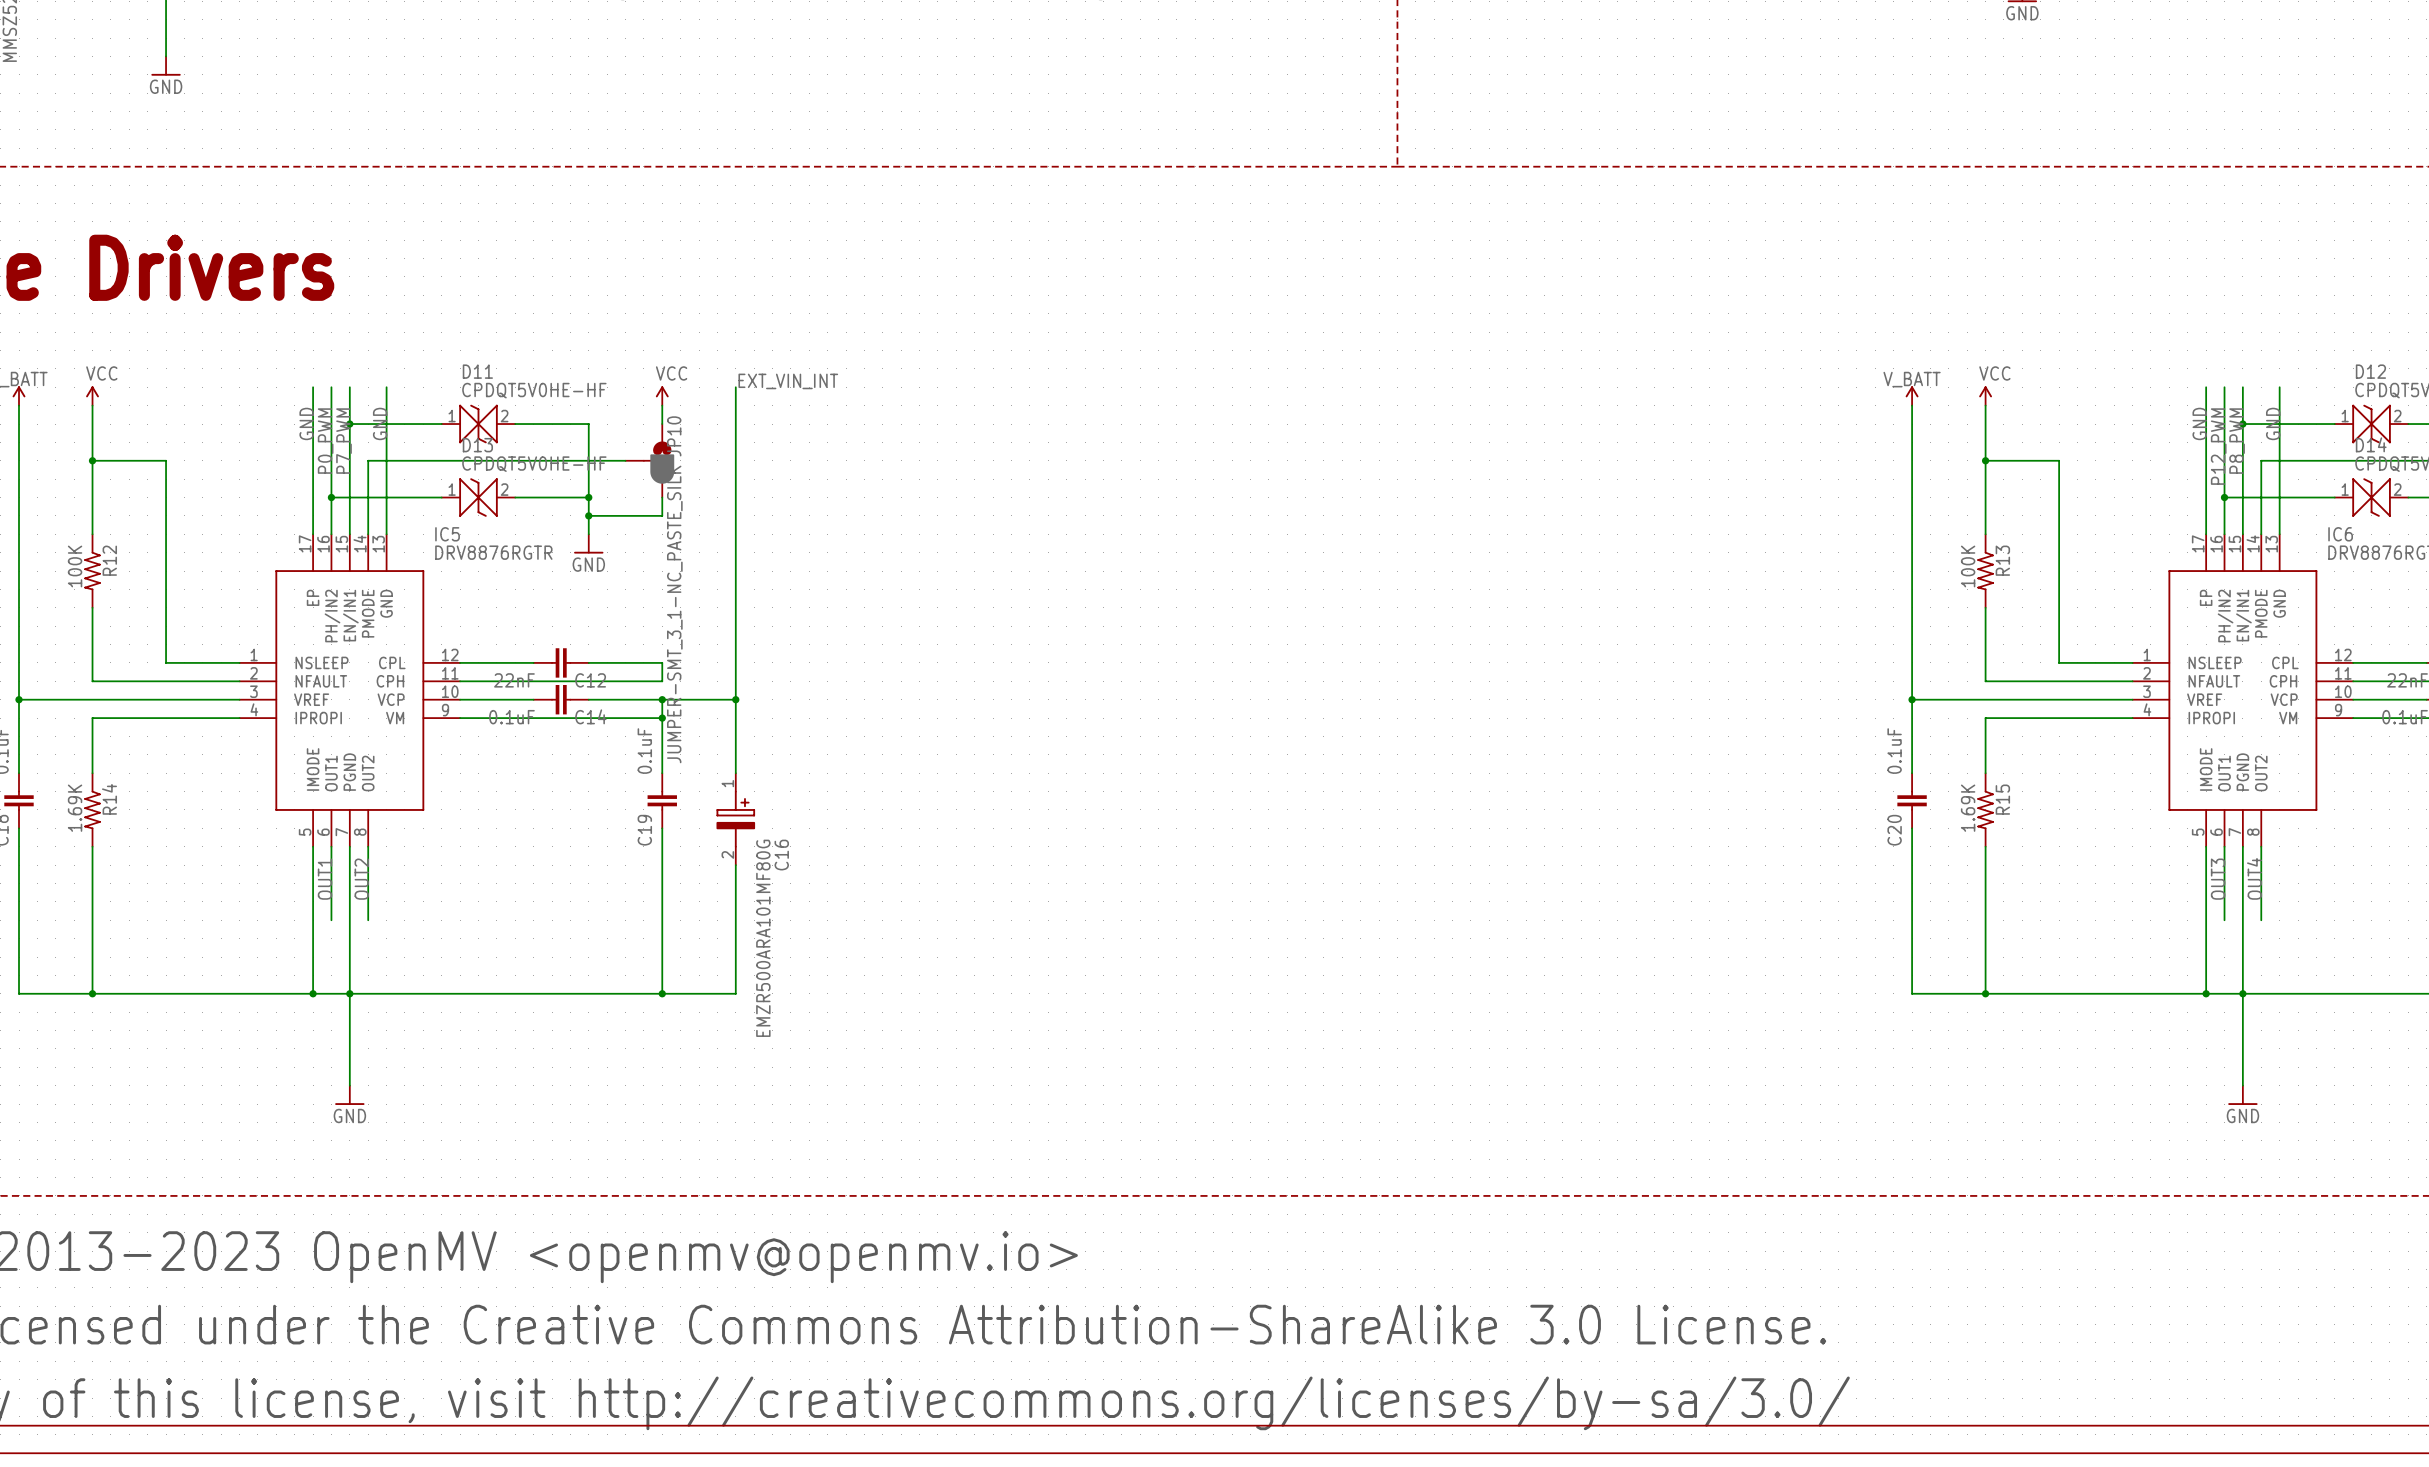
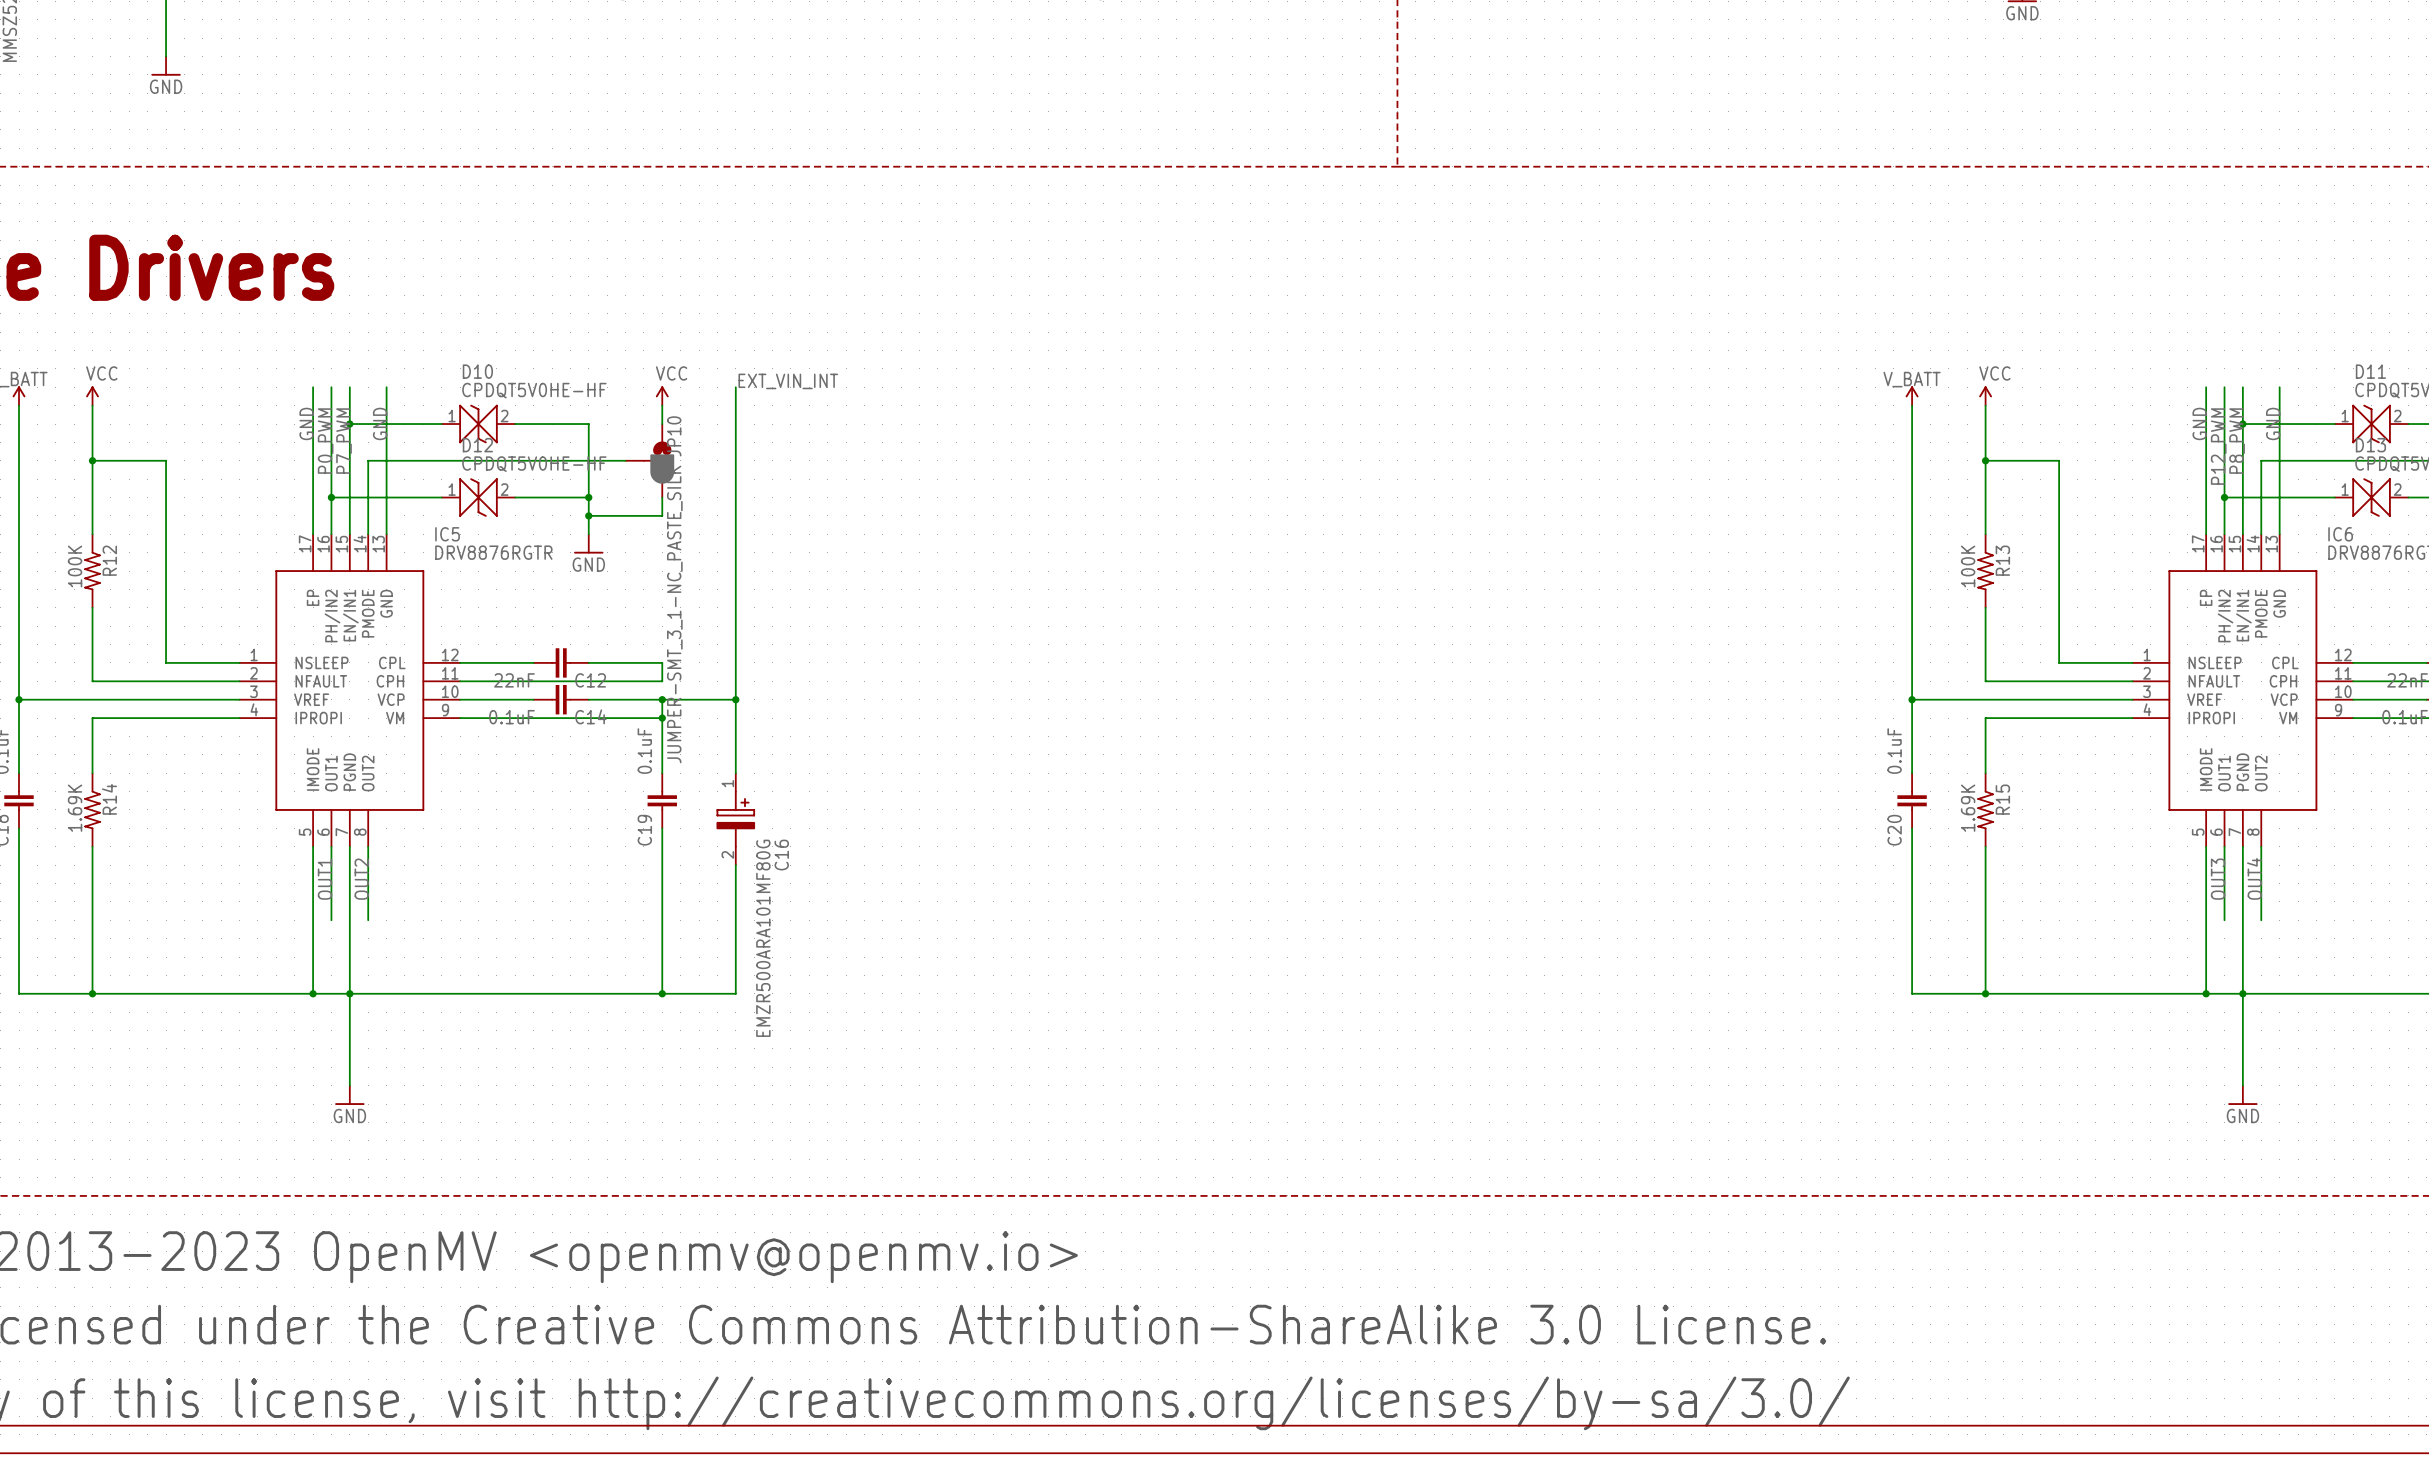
D11 name: D11 (477, 371) -> D10 (477, 371)
D12 name: D12 (2370, 371) -> D11 (2370, 371)
D14 name: D14 (2371, 444) -> D13 (2370, 445)
D13 name: D13 (477, 445) -> D12 (477, 445)

